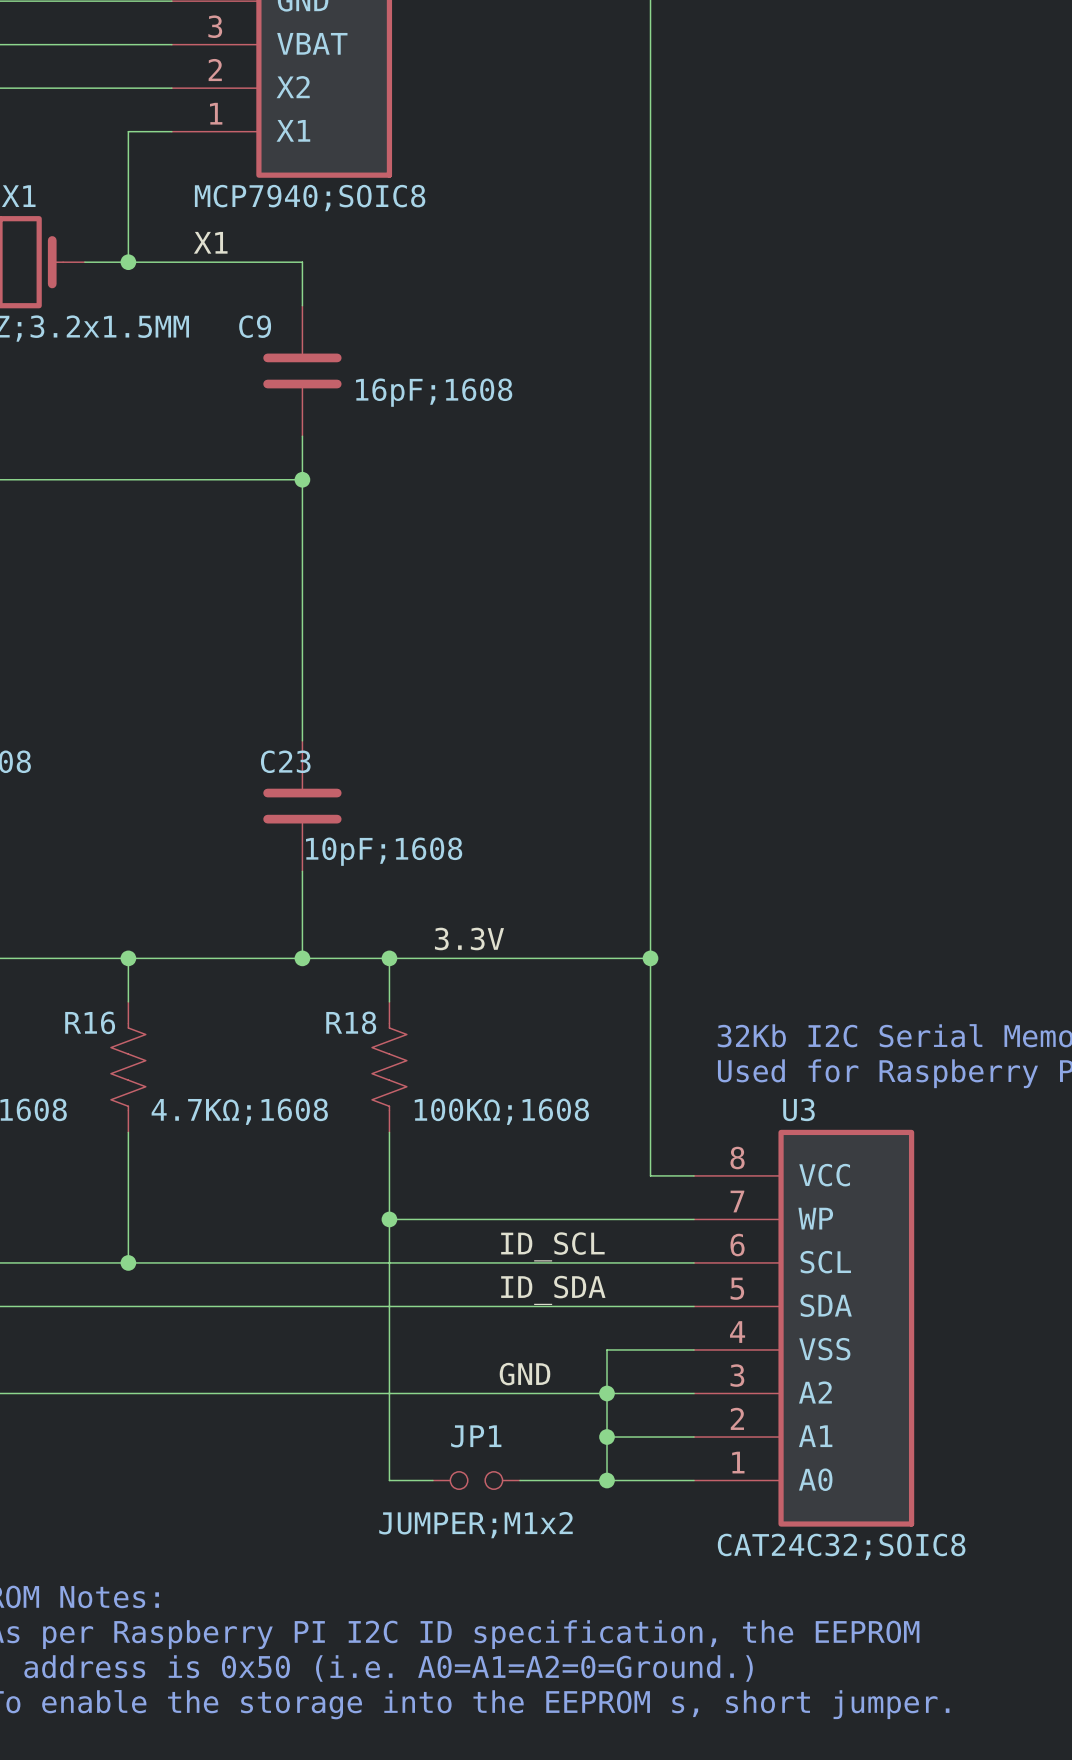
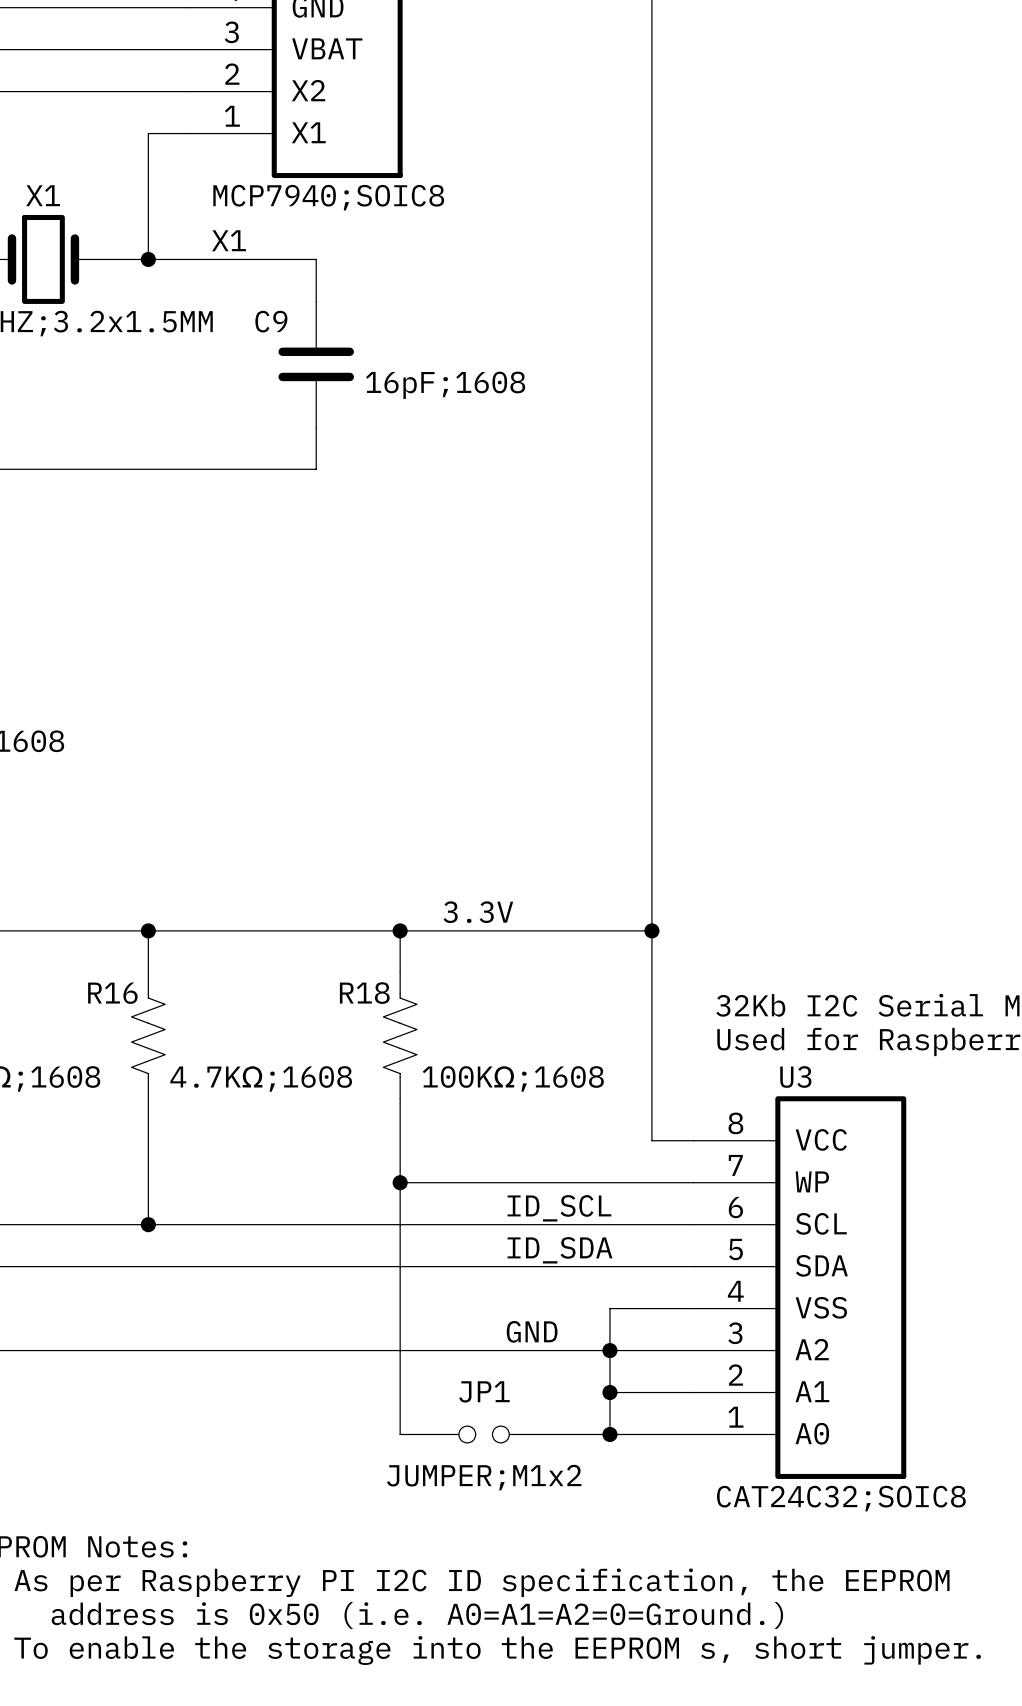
wire: (302, 479) (302, 740) -> none
junction: (302, 479) -> none
C23: 10pF;1608 (302, 806) -> none
wire: (302, 871) (302, 958) -> none
junction: (302, 958) -> none

